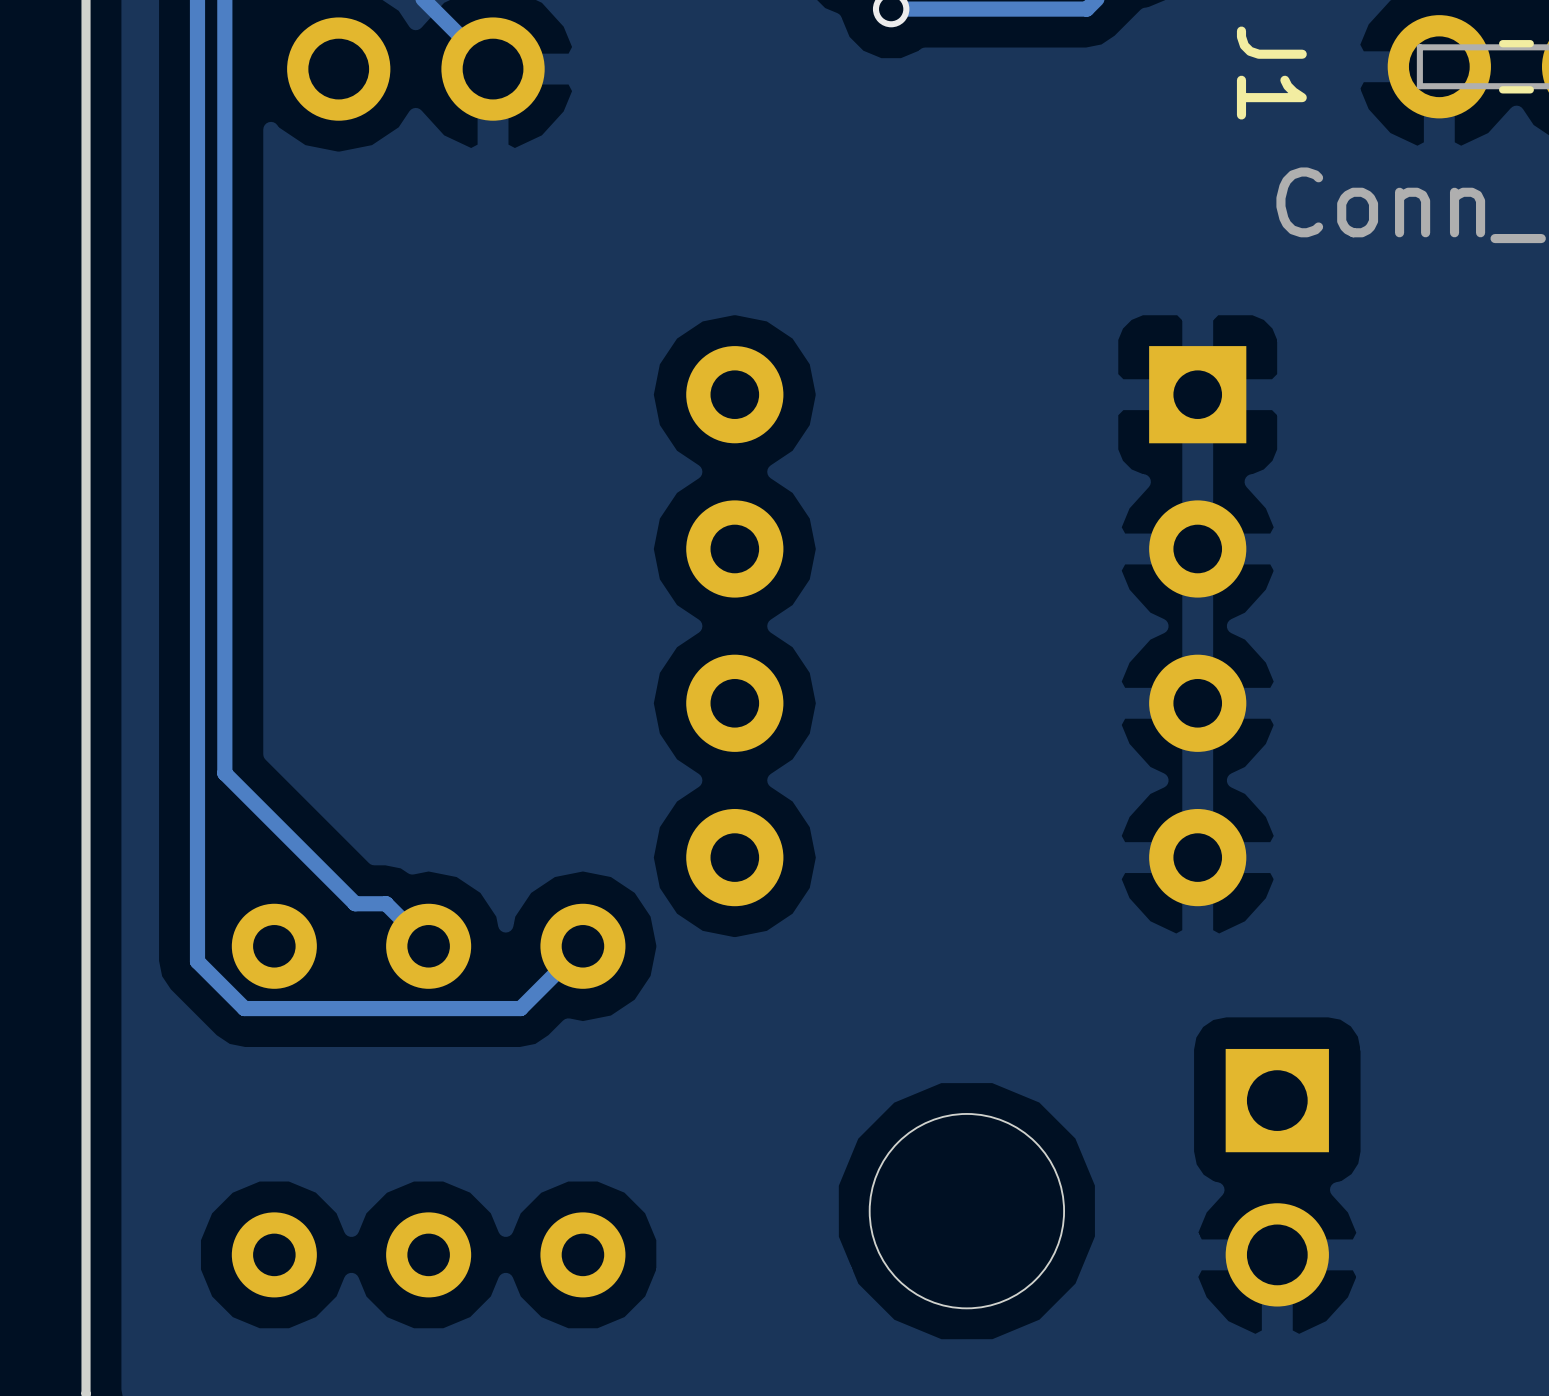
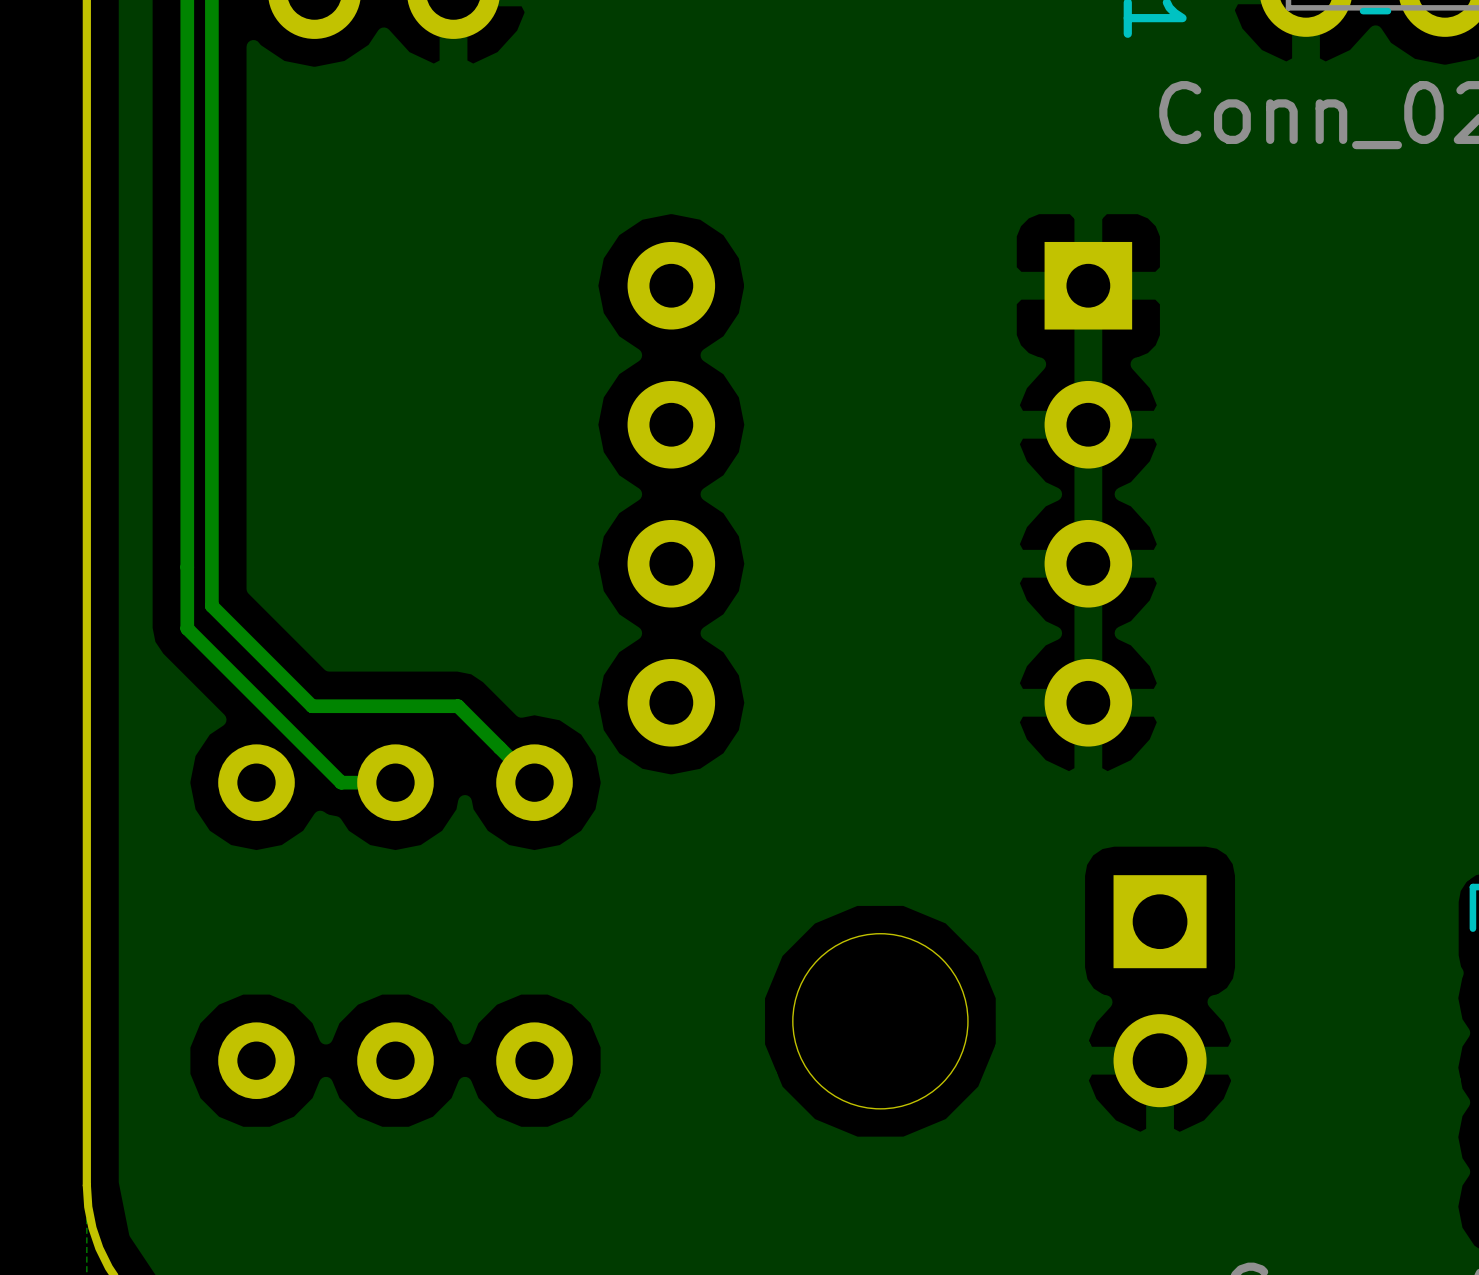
track: (224, 750) (224, 773) (355, 903) (386, 903) (428, 946) -> (187, 628) (341, 782) (395, 782)
track: (197, 775) (197, 961) (244, 1008) (520, 1008) (582, 946) -> (211, 606) (312, 706) (458, 706) (534, 782)

